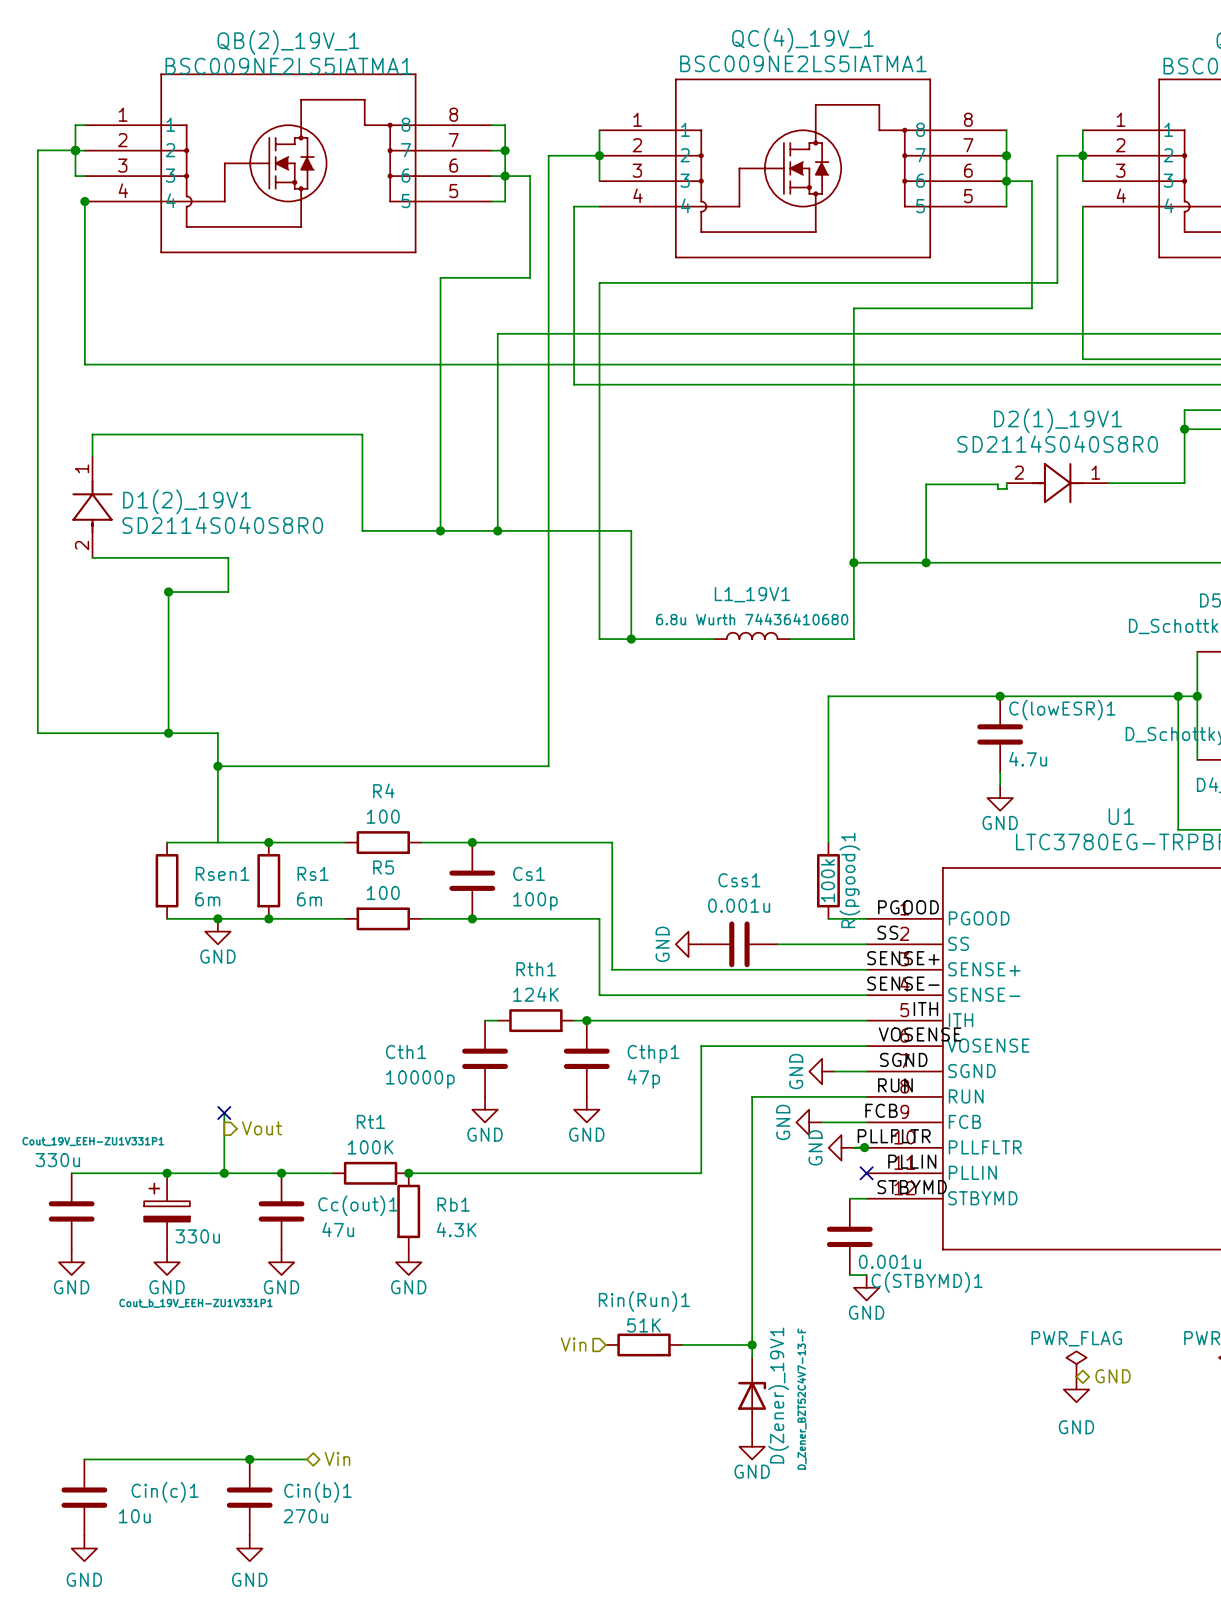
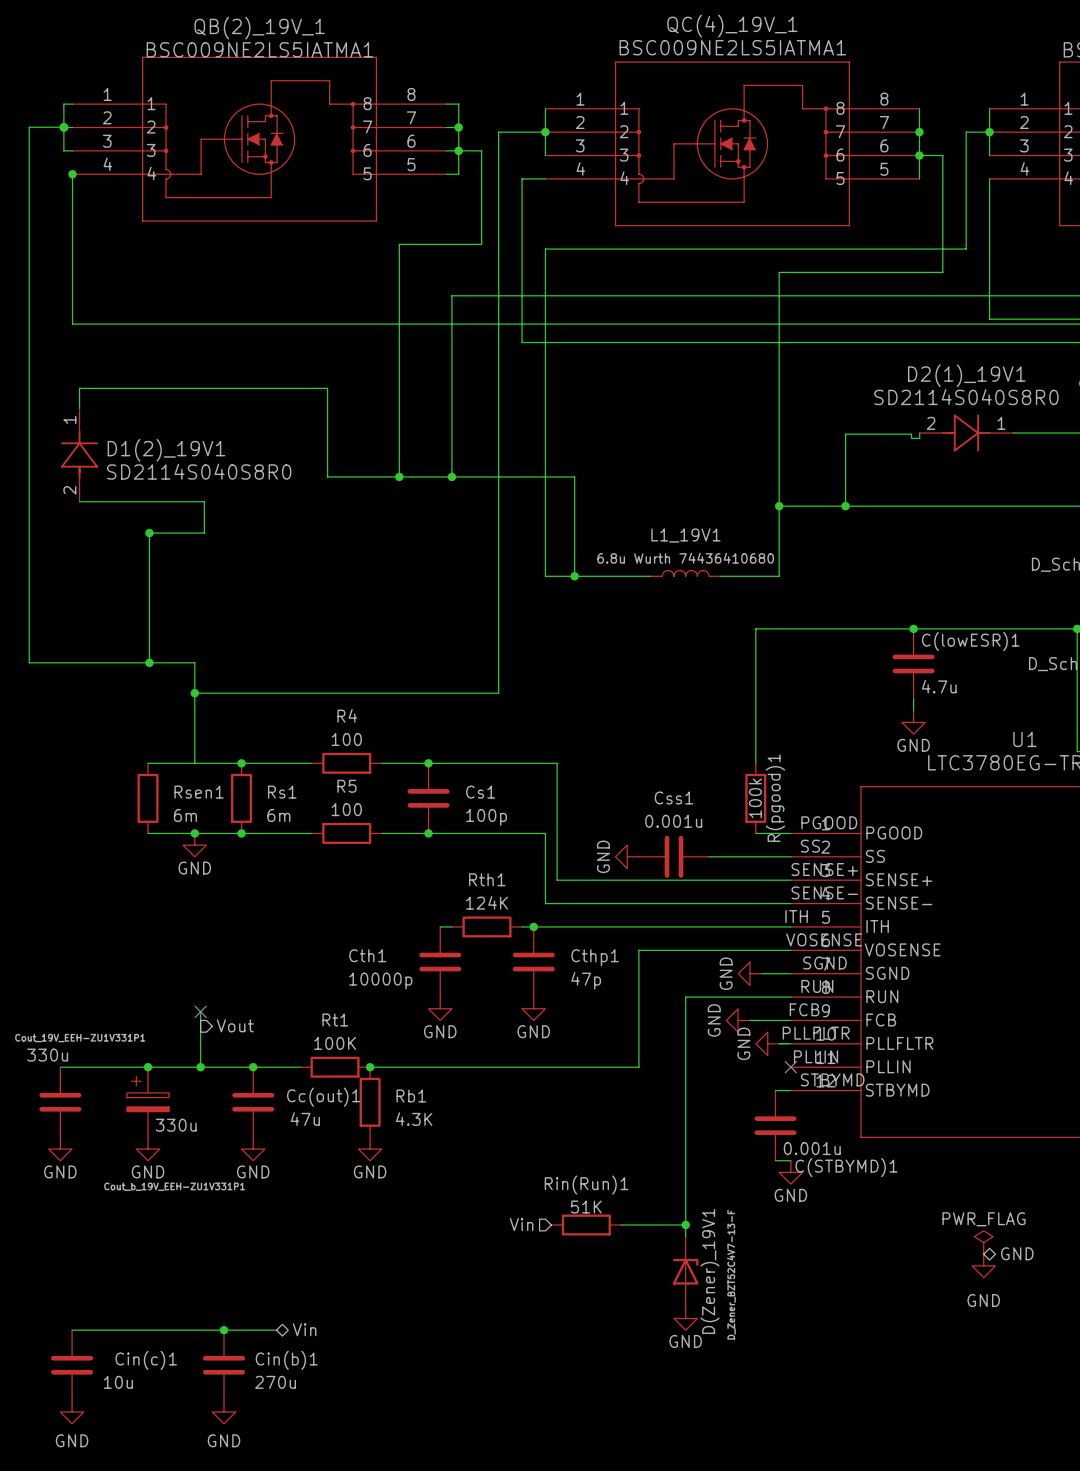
label position: ITH (925, 1009) -> ITH (796, 916)
label position: VOSENSE (920, 1034) -> VOSENSE (824, 939)
junction: (864, 1147) -> none
label position: PLLIN (912, 1161) -> PLLIN (816, 1056)

